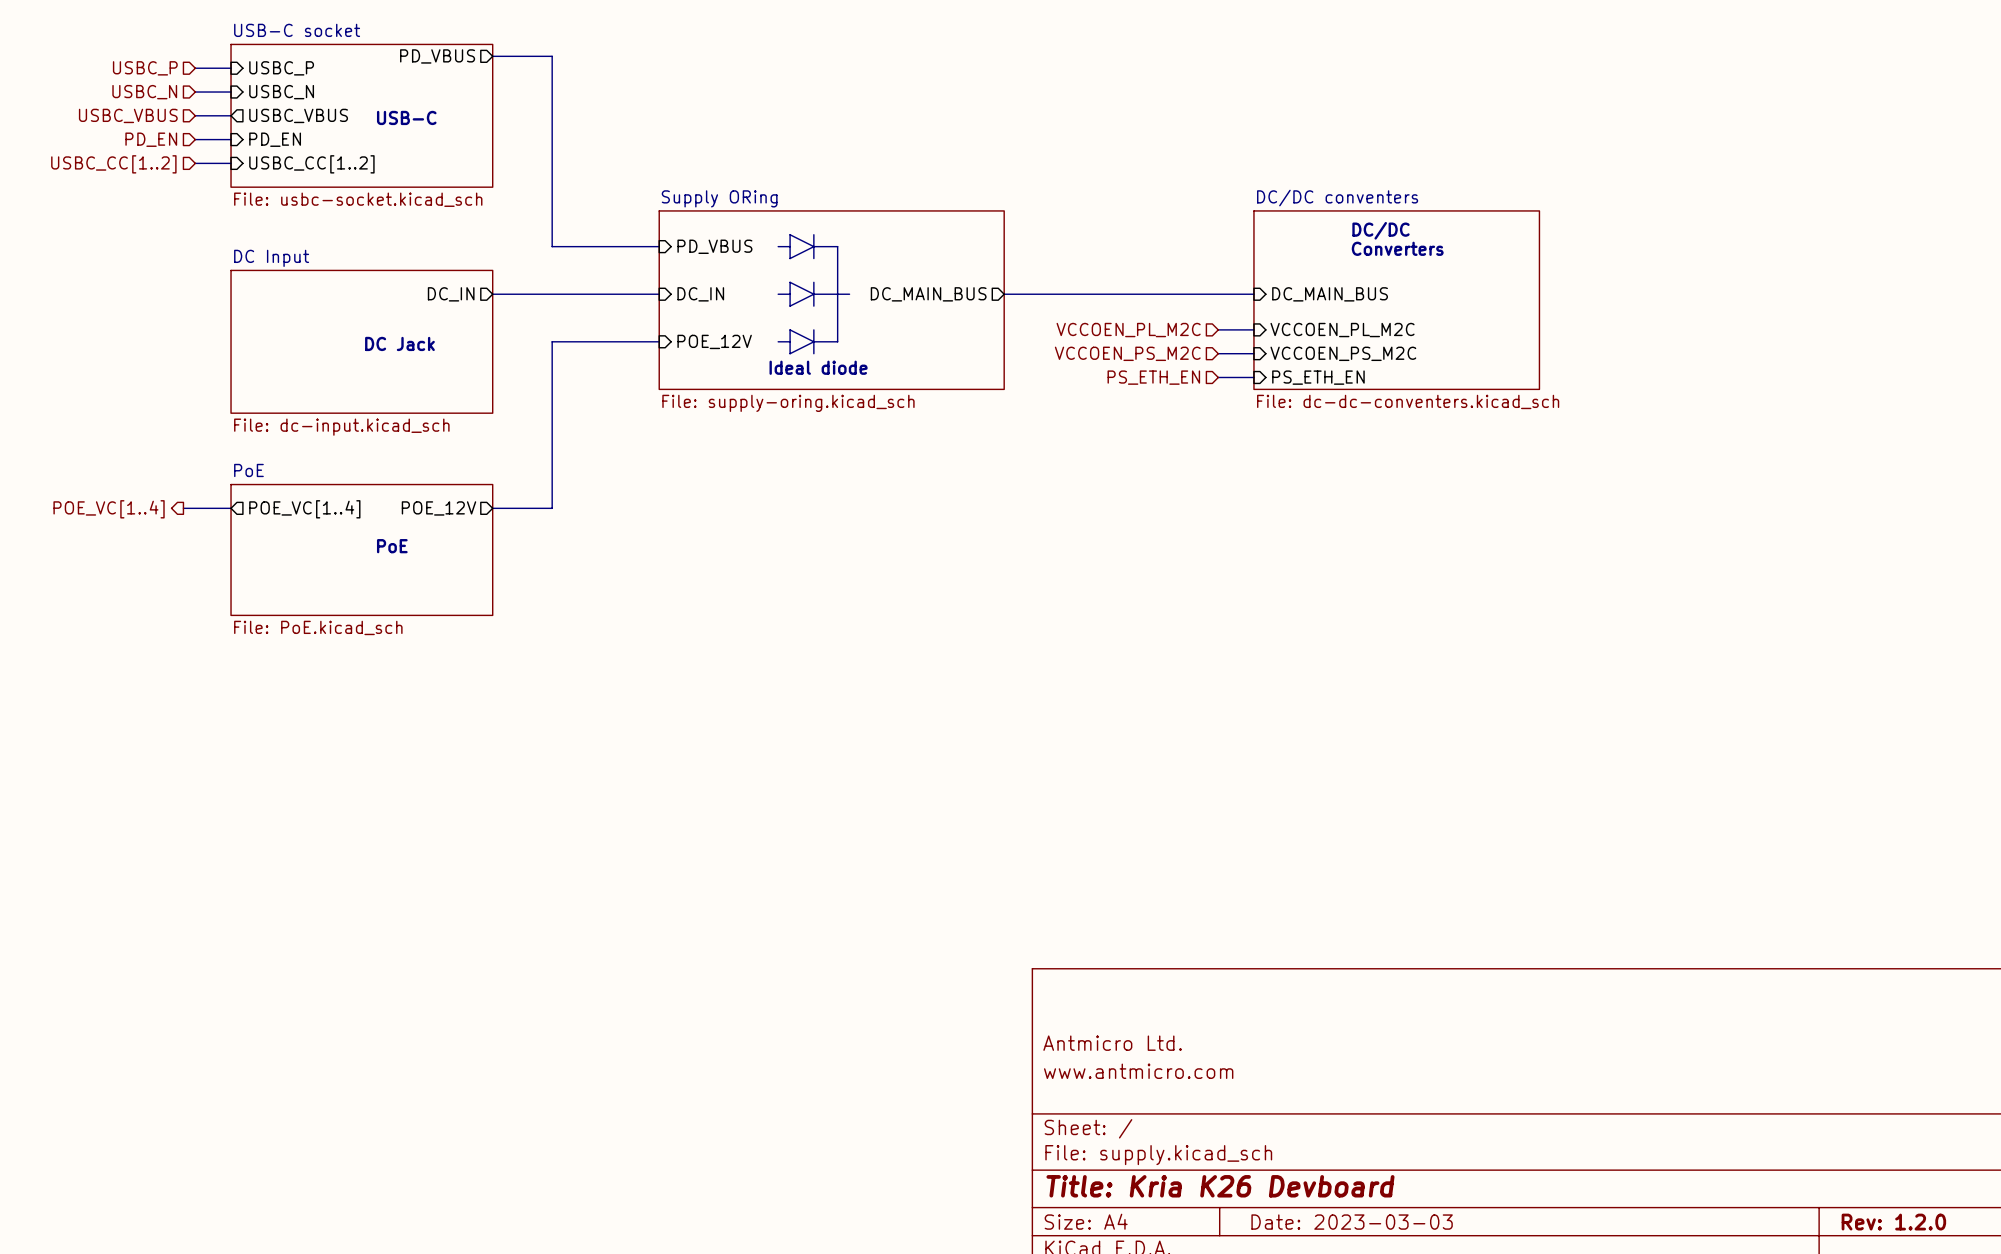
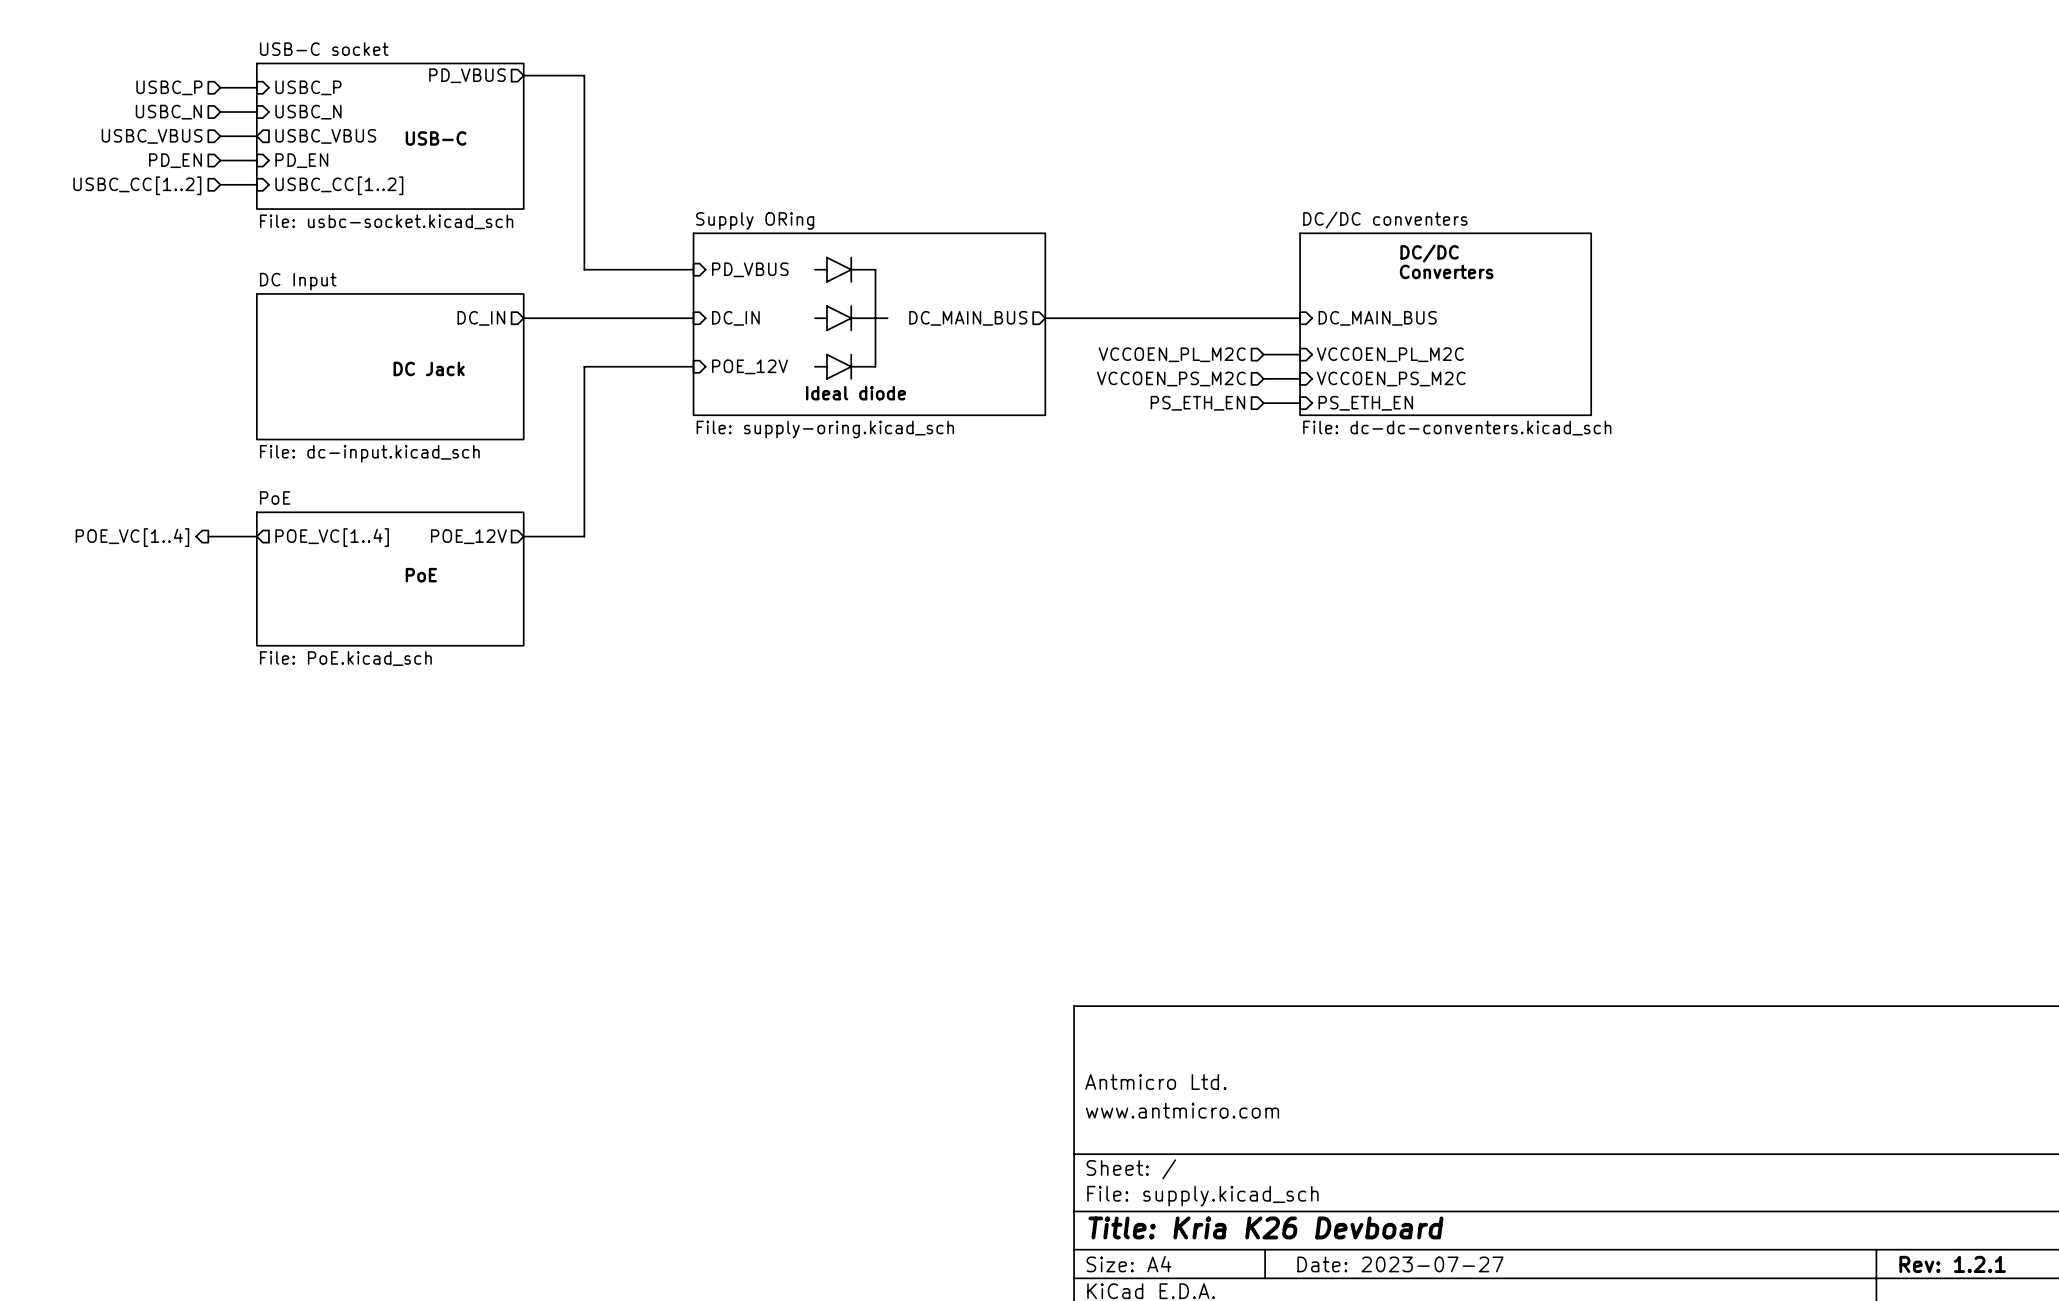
title block: Date: 2023-03-03 (1352, 1222) -> Date: 2023-07-27 (1400, 1264)
title block: Rev: 1.2.0 (1893, 1222) -> Rev: 1.2.1 (1952, 1264)

